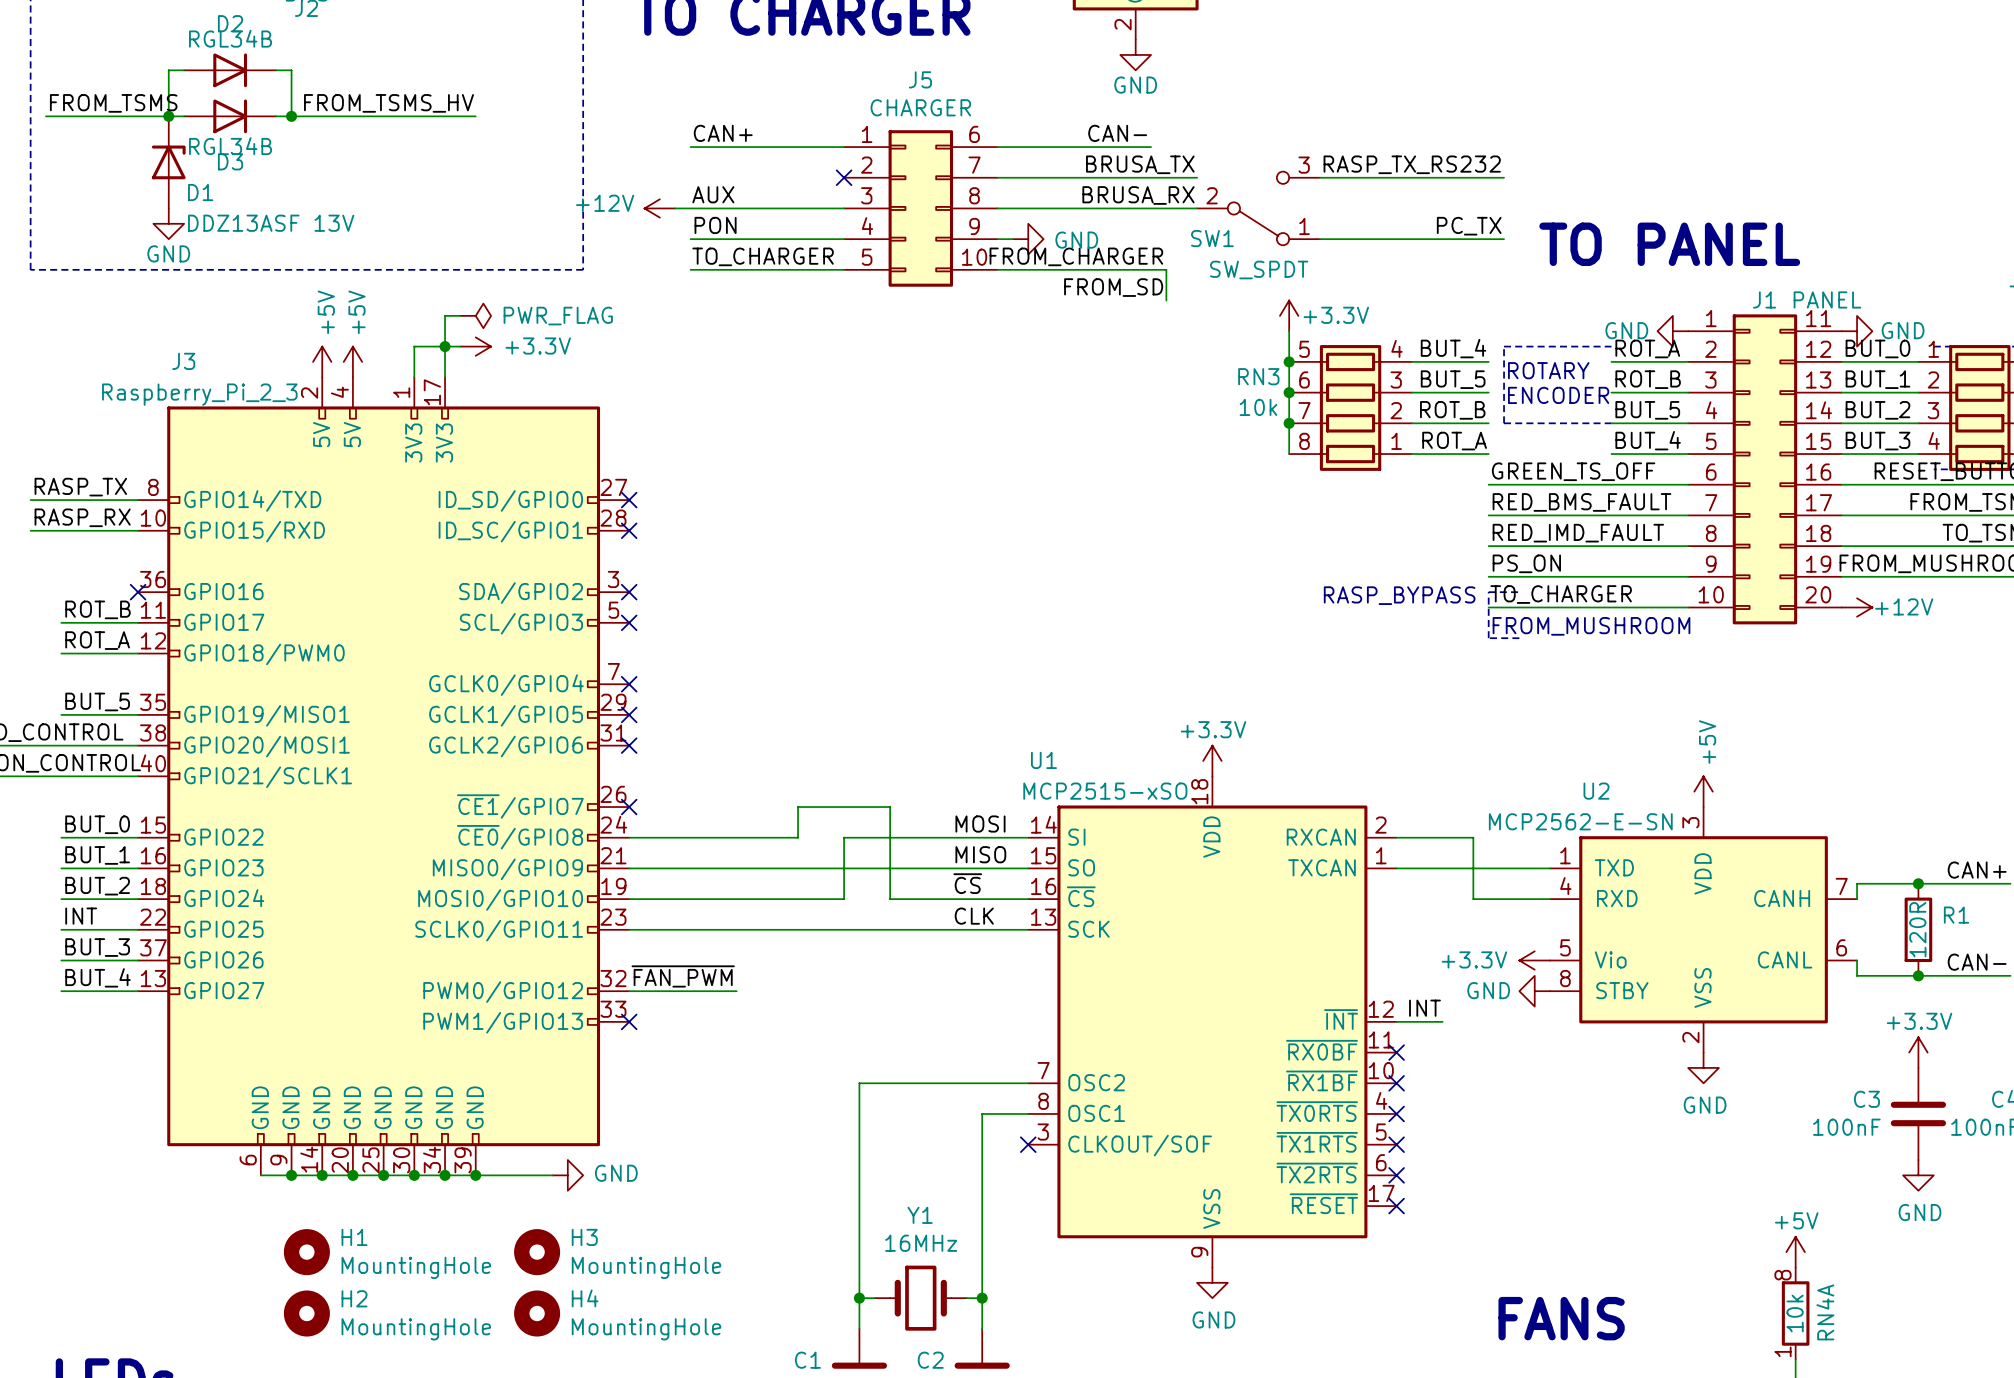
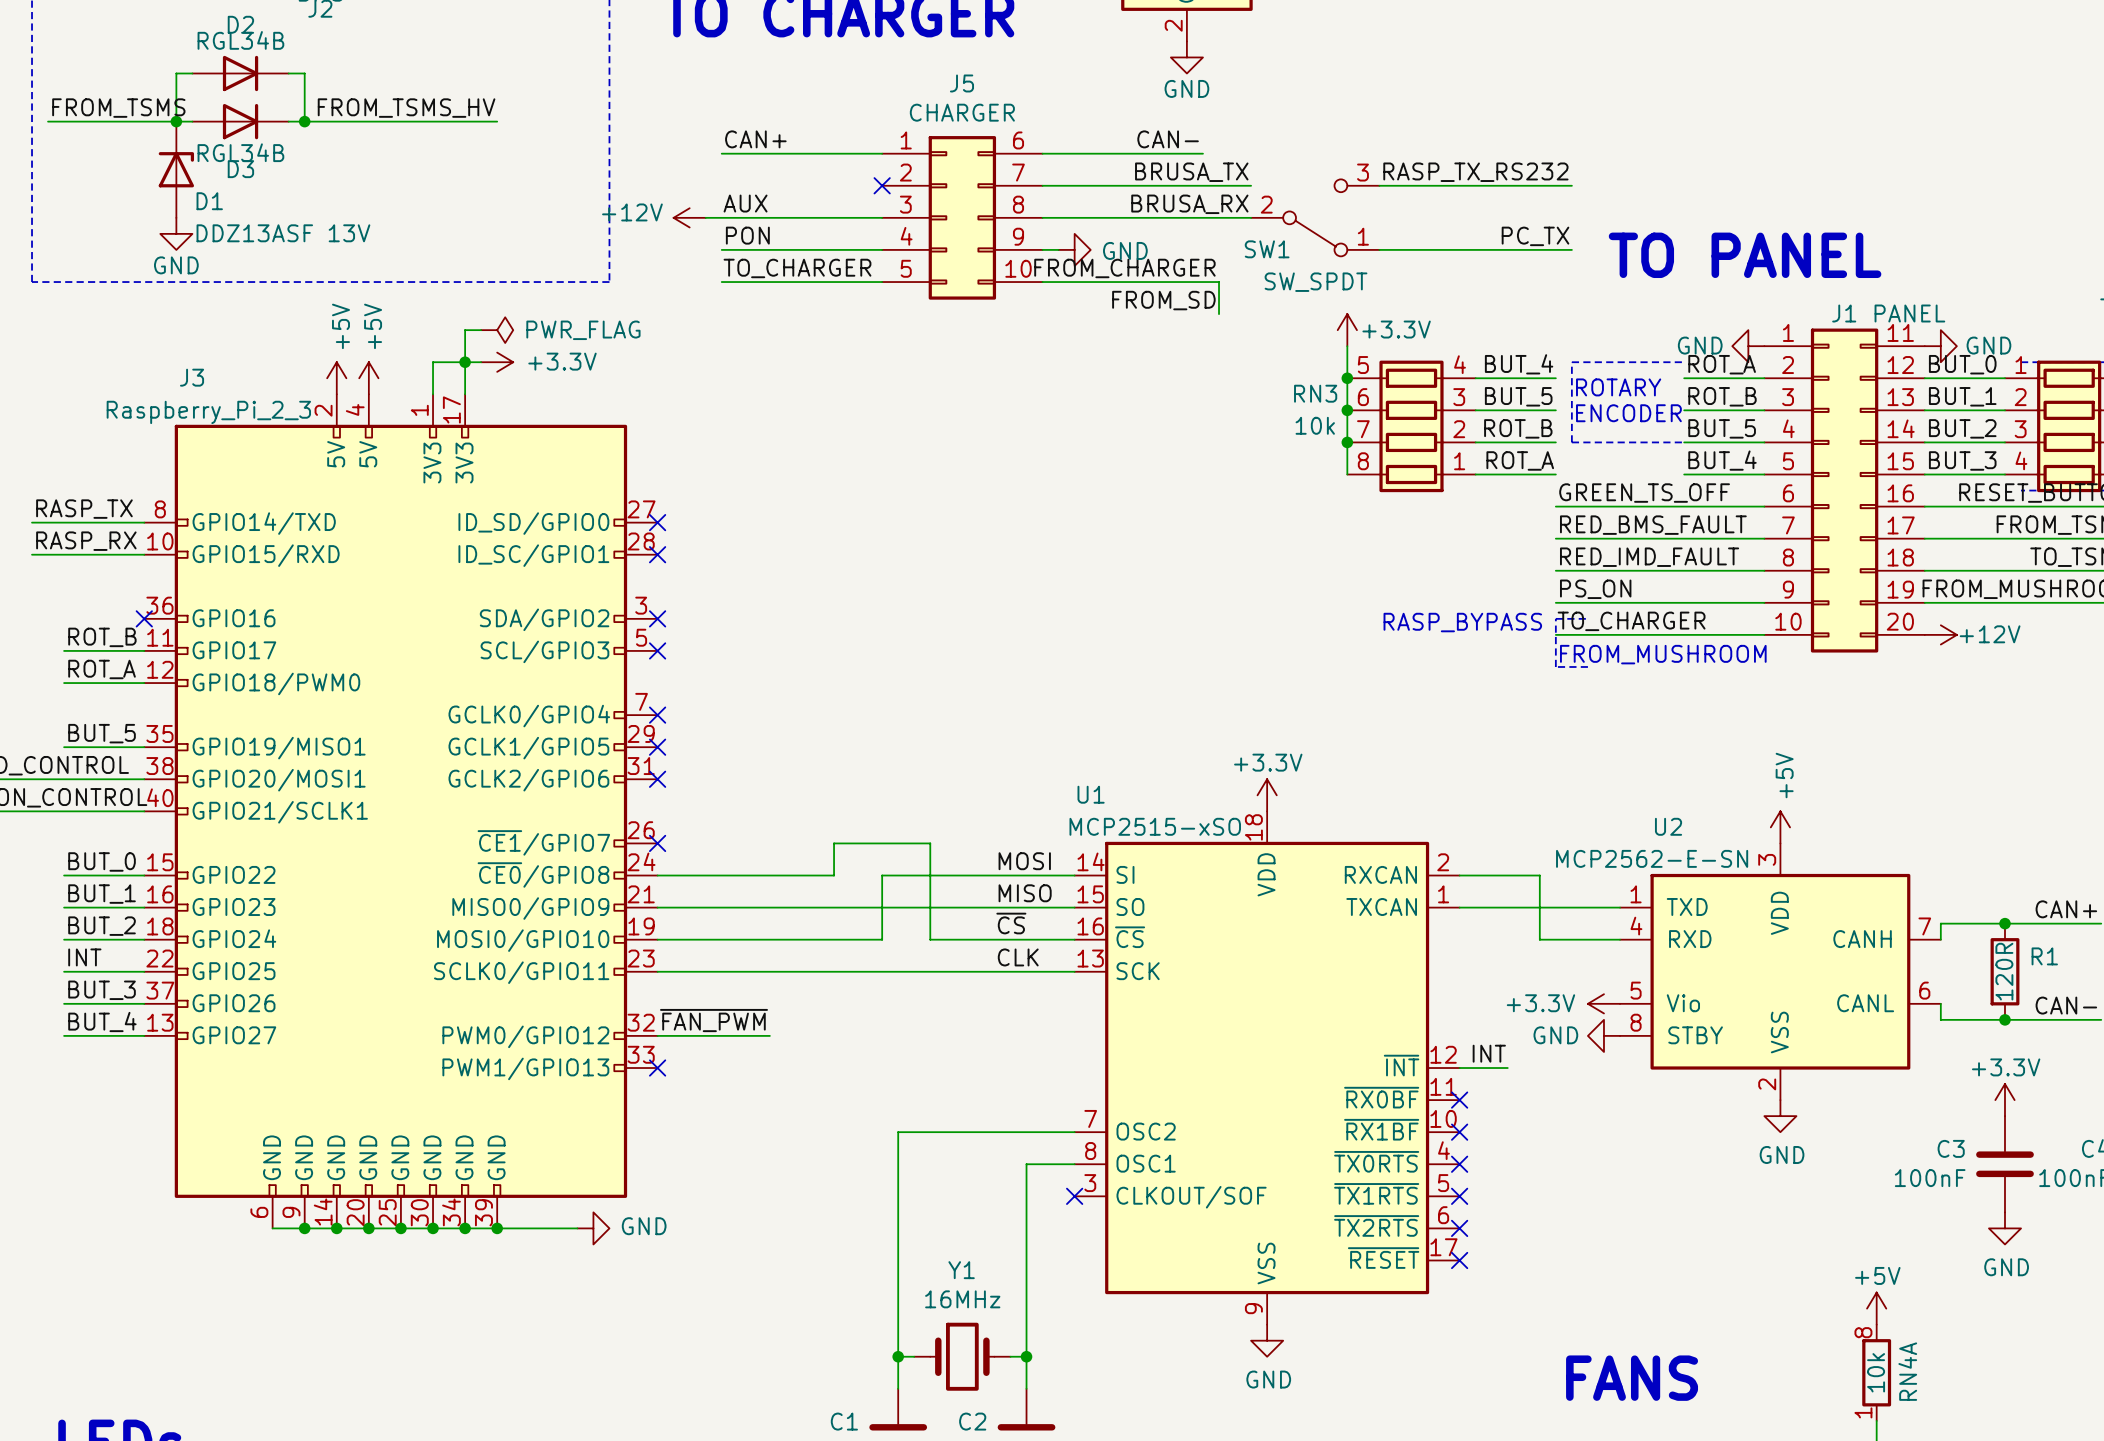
H1: MountingHole (306, 1252) -> none
H3: MountingHole (537, 1252) -> none
H2: MountingHole (306, 1313) -> none
H4: MountingHole (537, 1313) -> none

